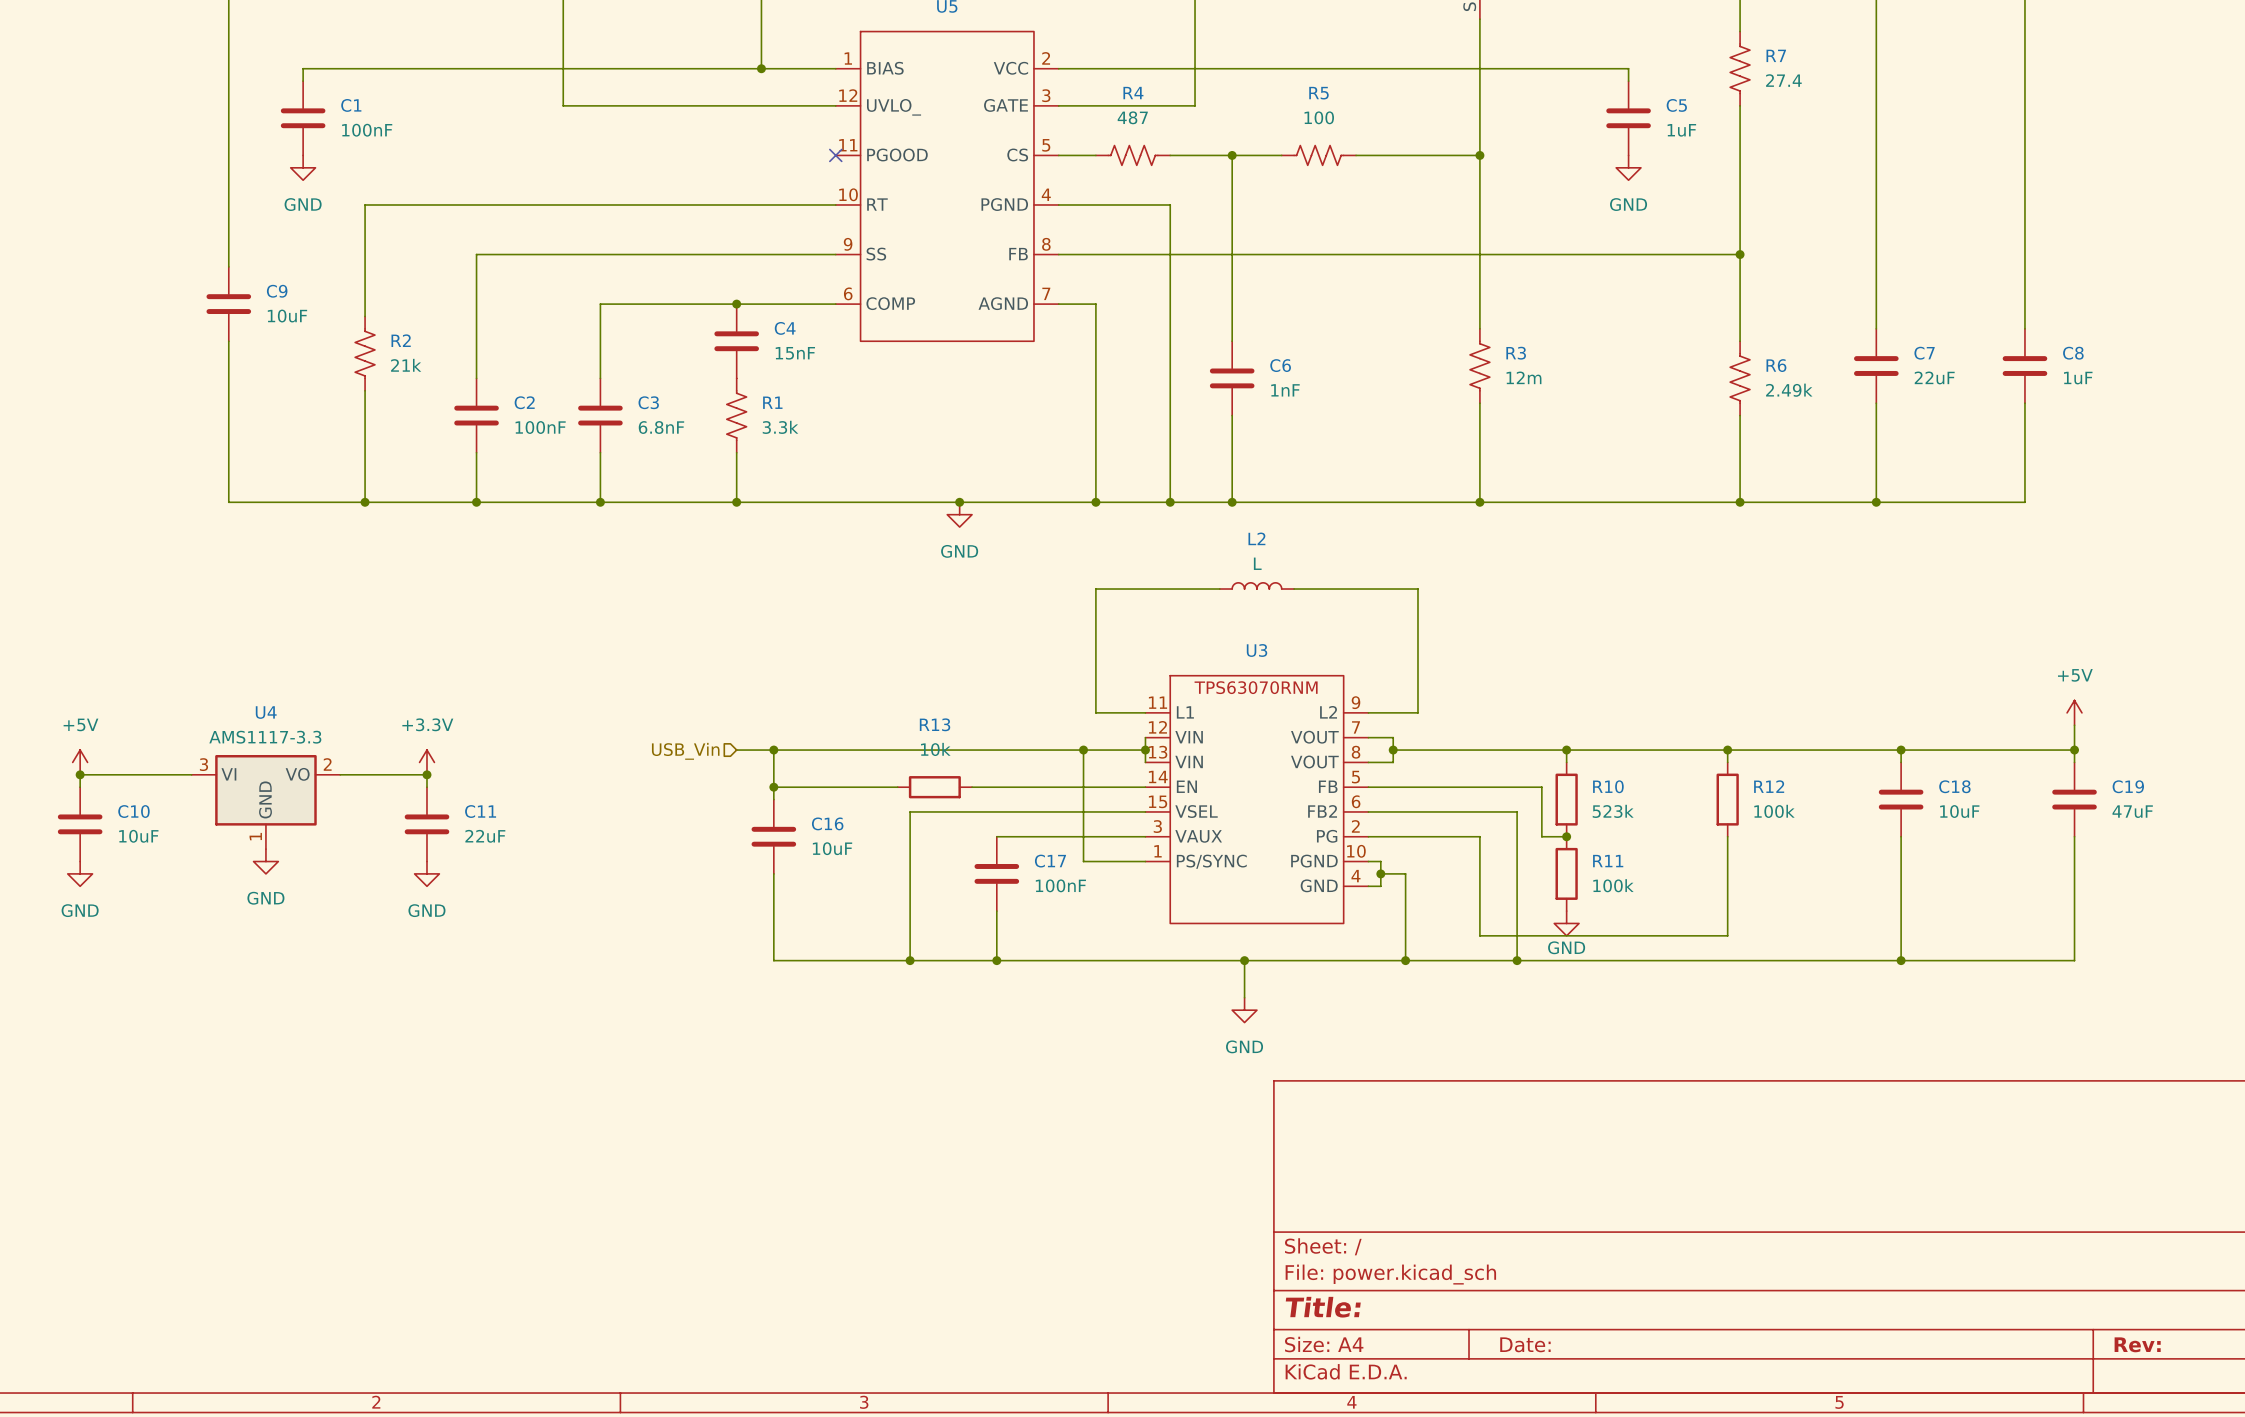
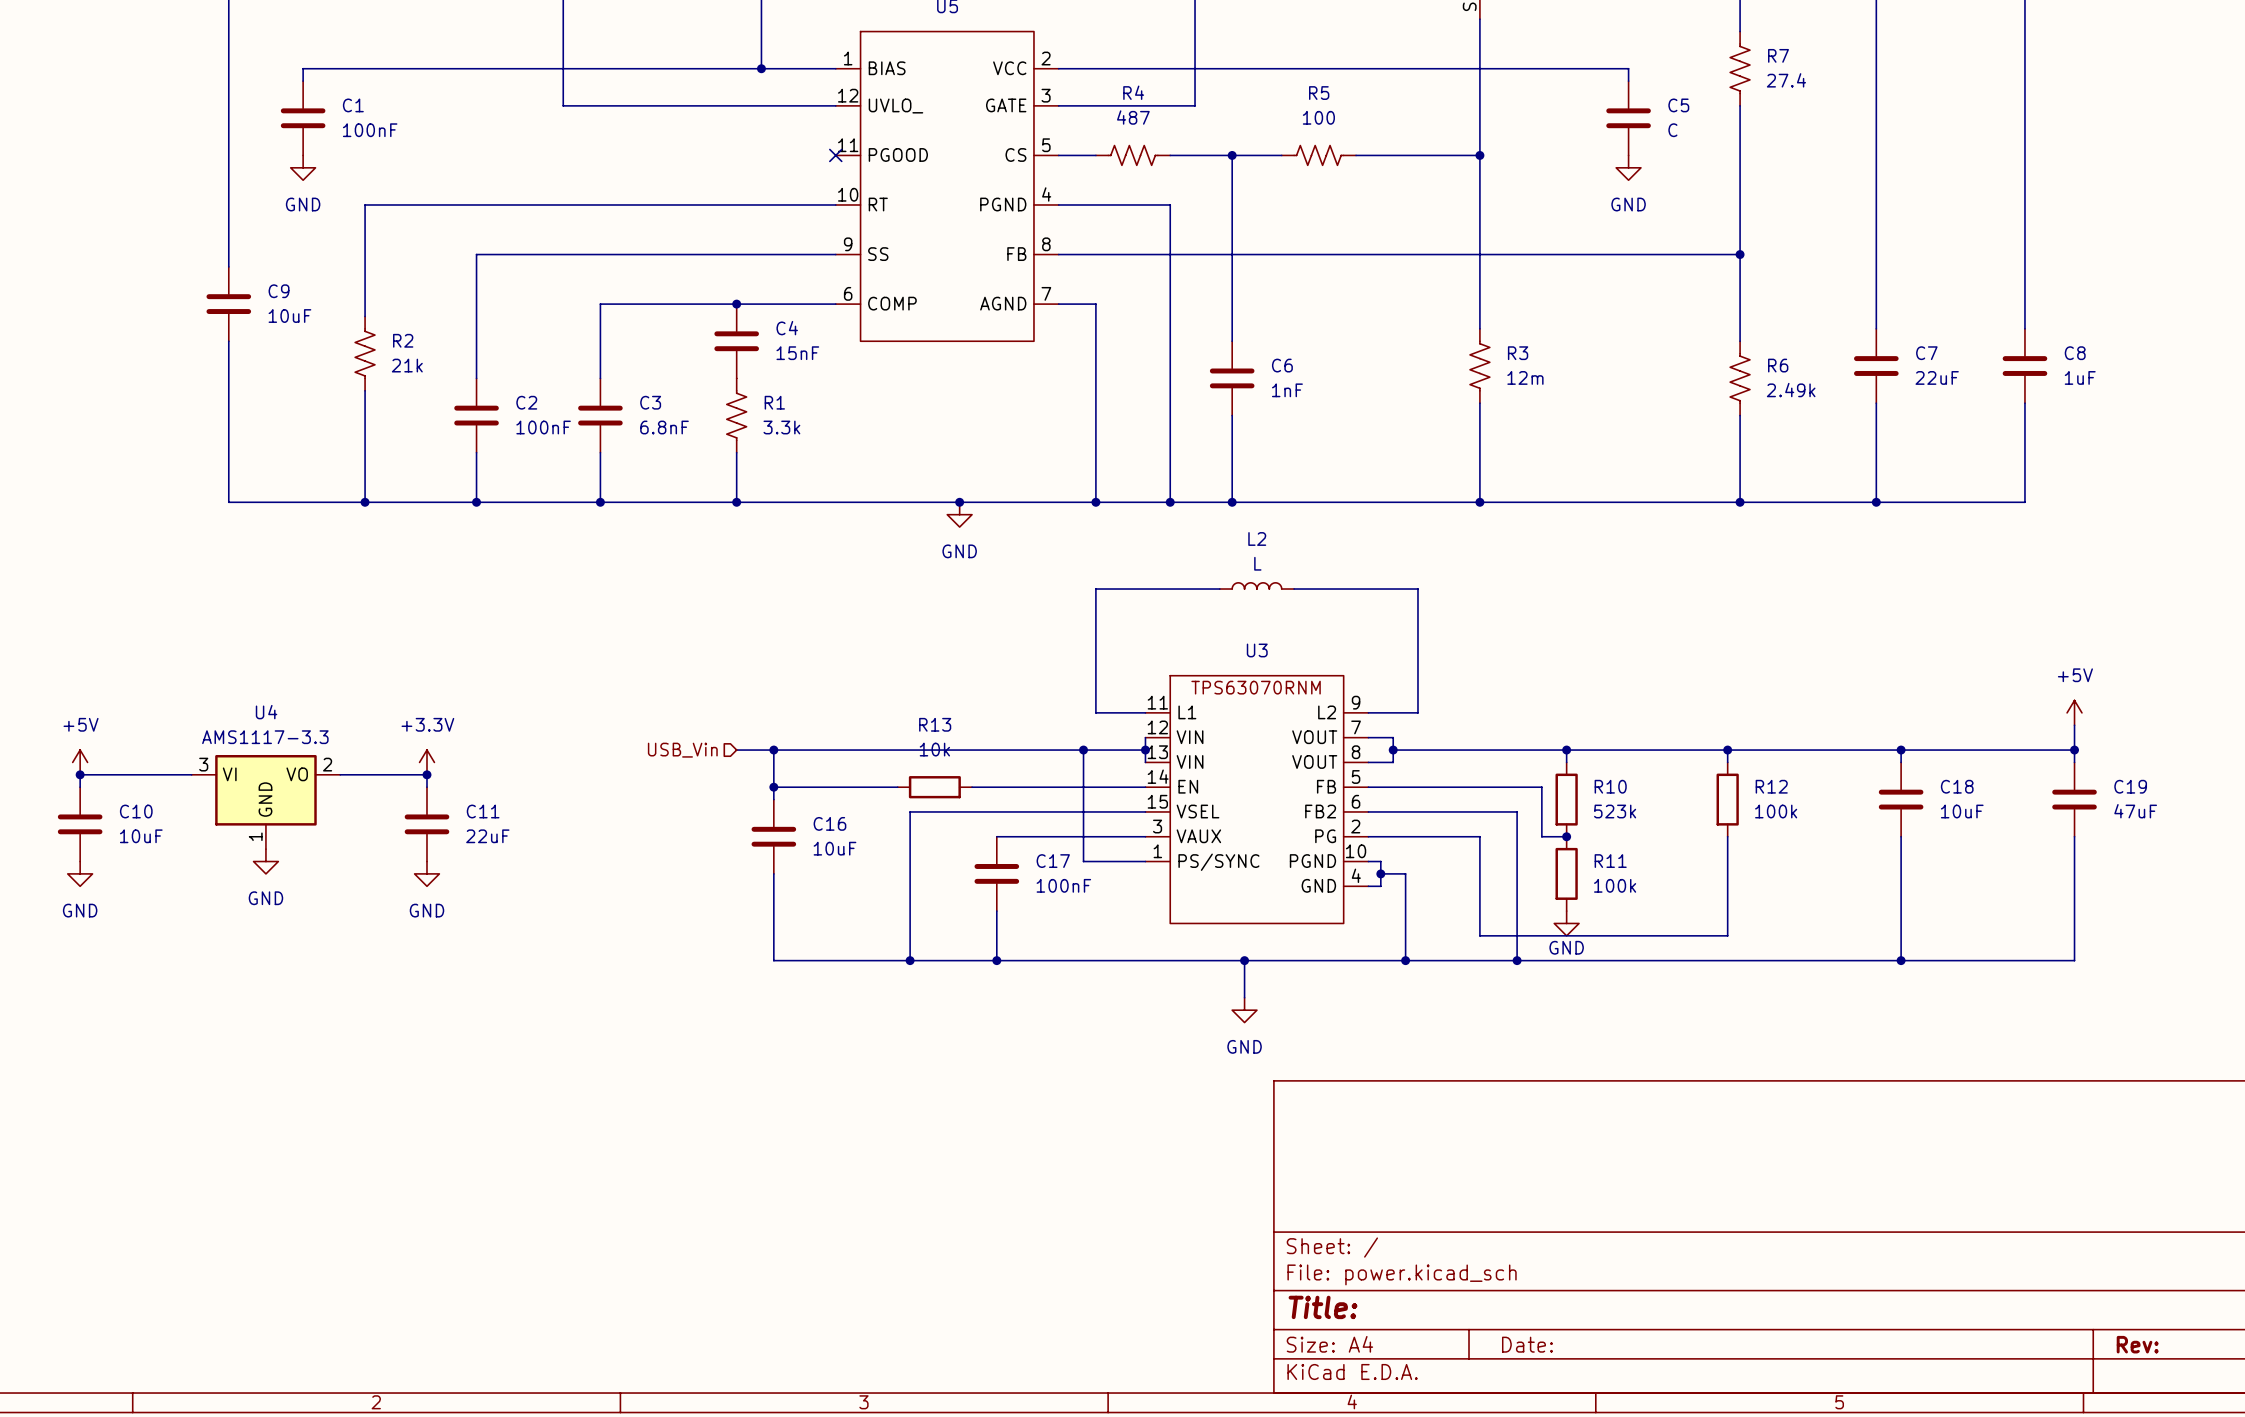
C5 value: 1uF (1681, 130) -> C (1672, 130)

